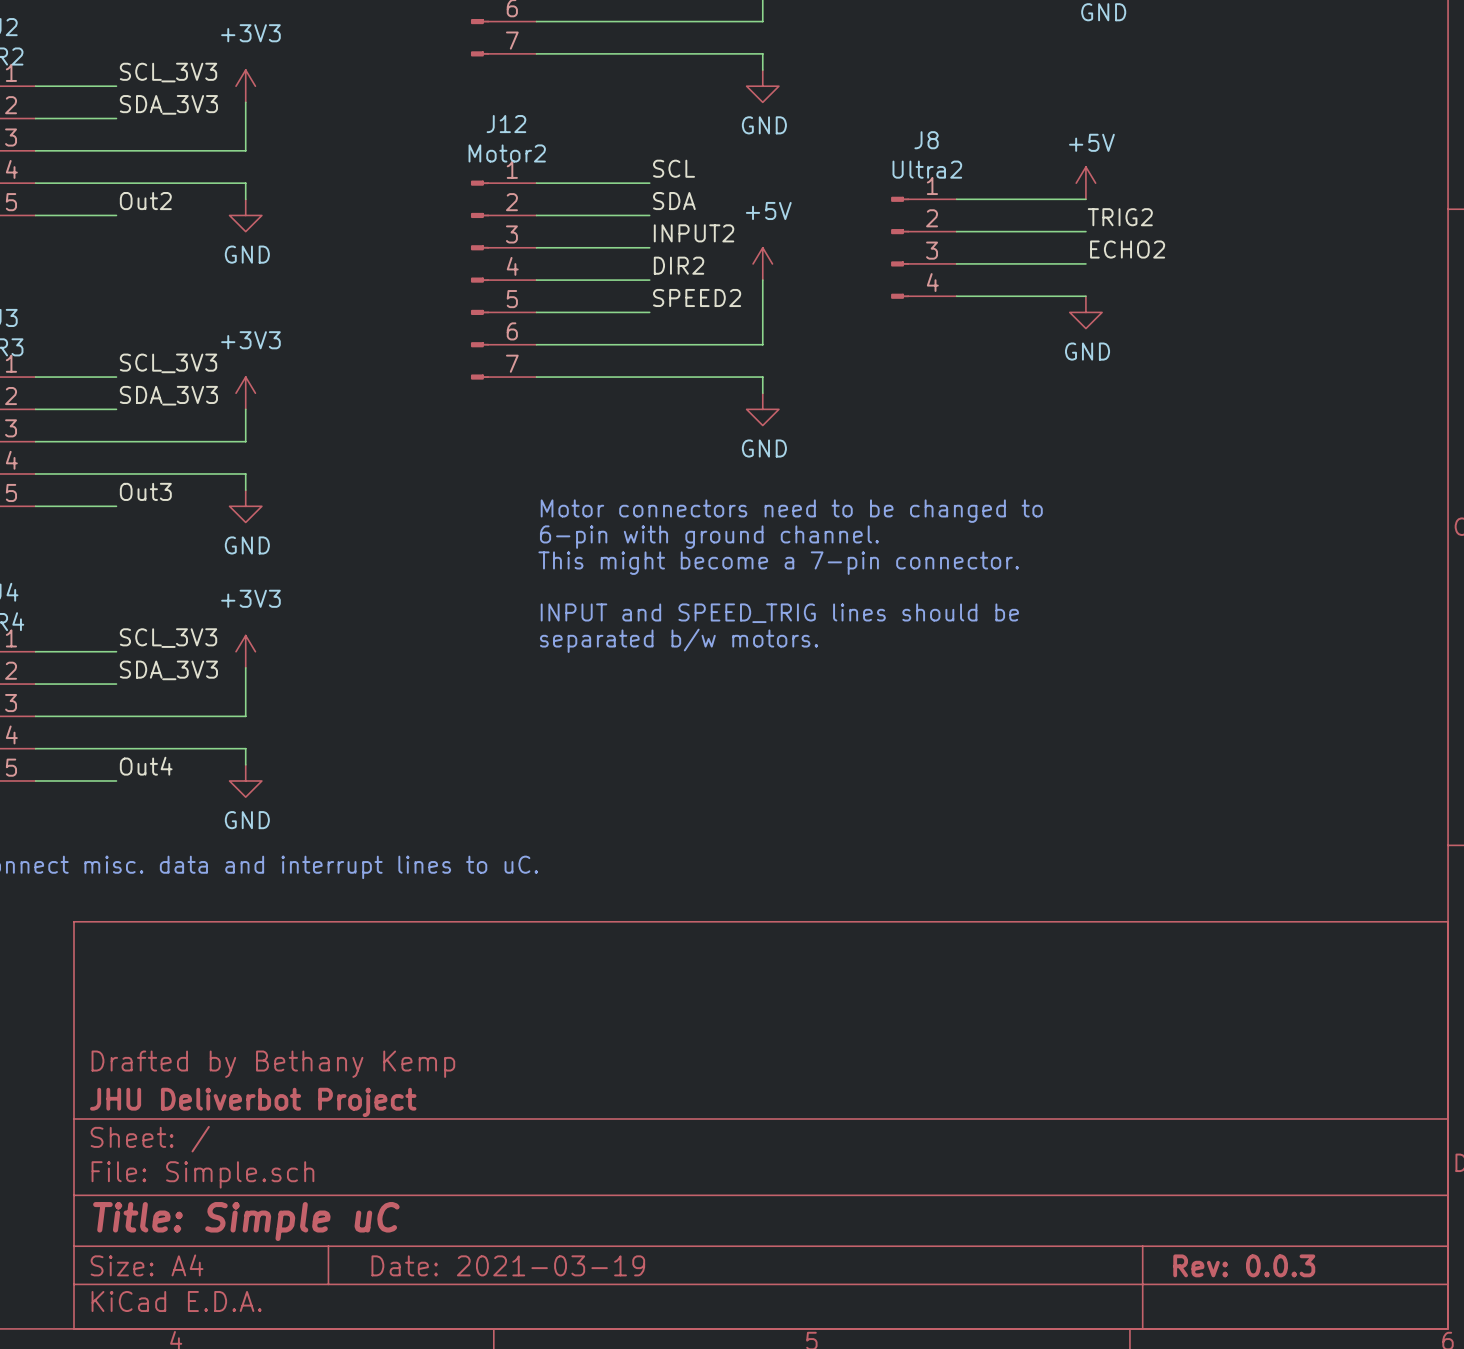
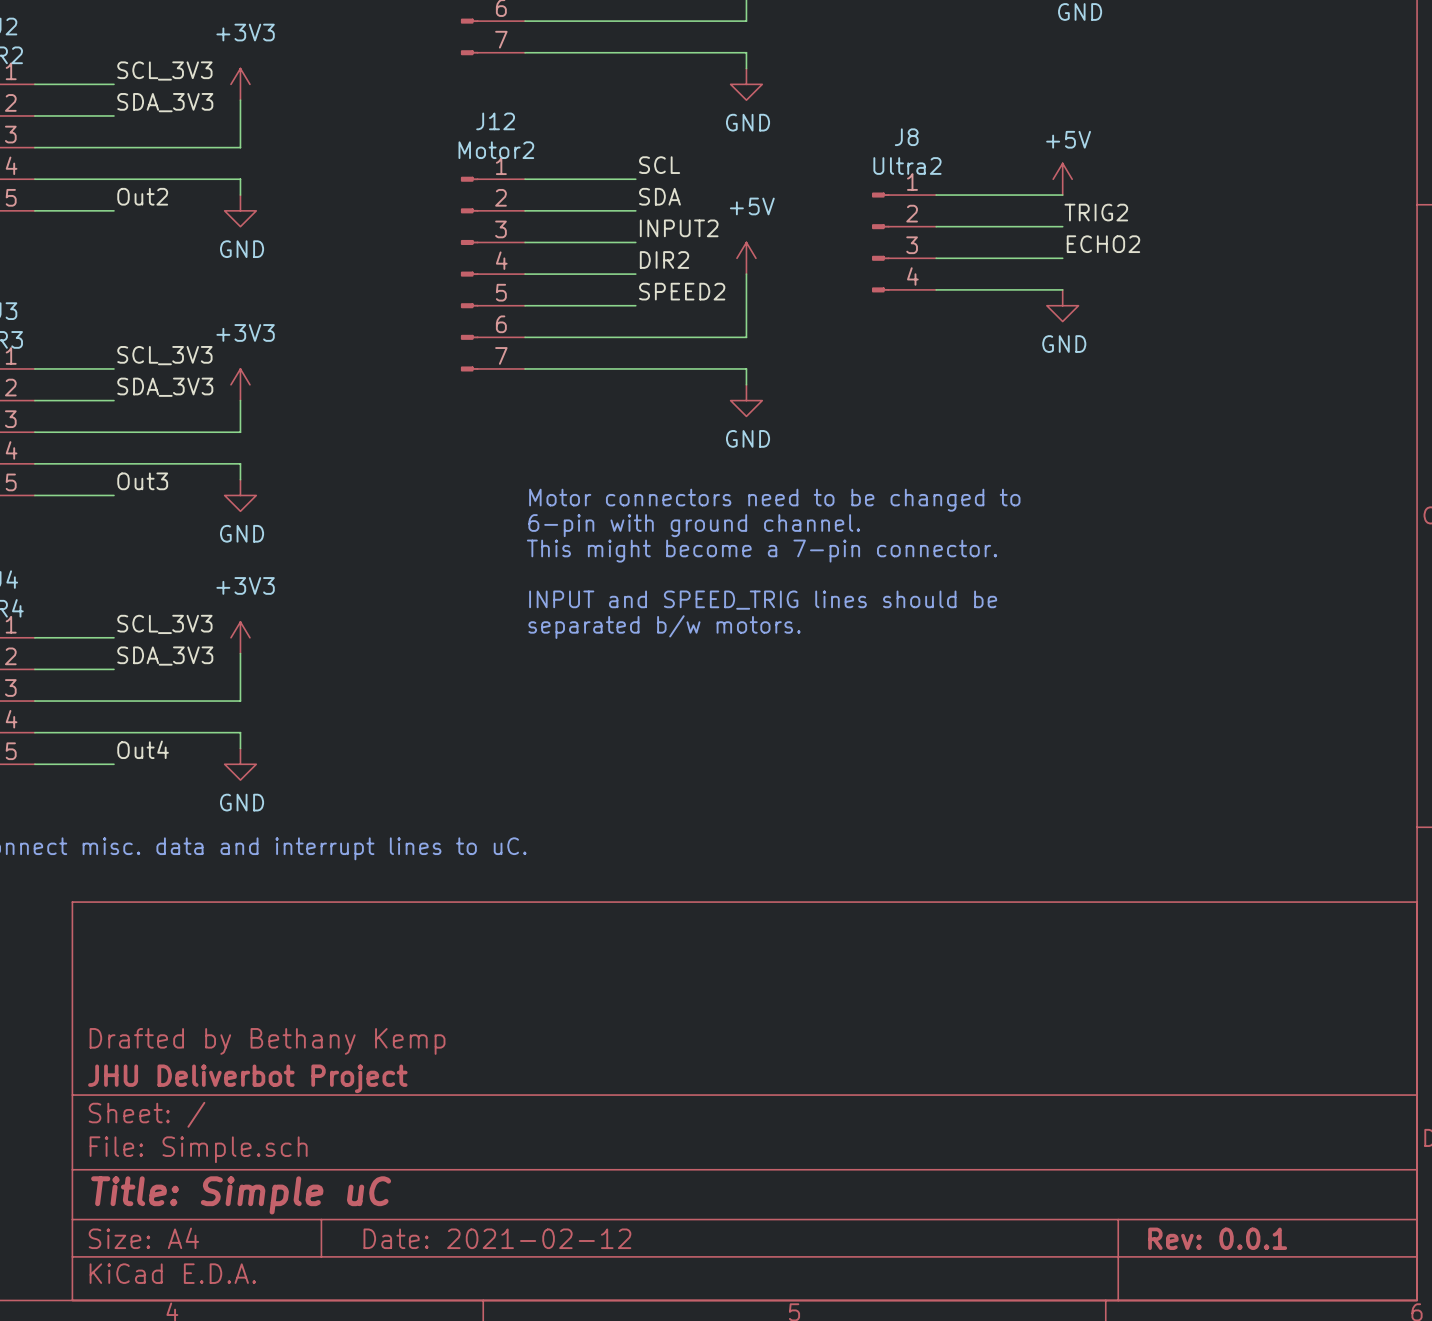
title block: Date: 2021-03-19 (508, 1265) -> Date: 2021-02-12 (497, 1238)
title block: Rev: 0.0.3 (1244, 1265) -> Rev: 0.0.1 (1217, 1238)

